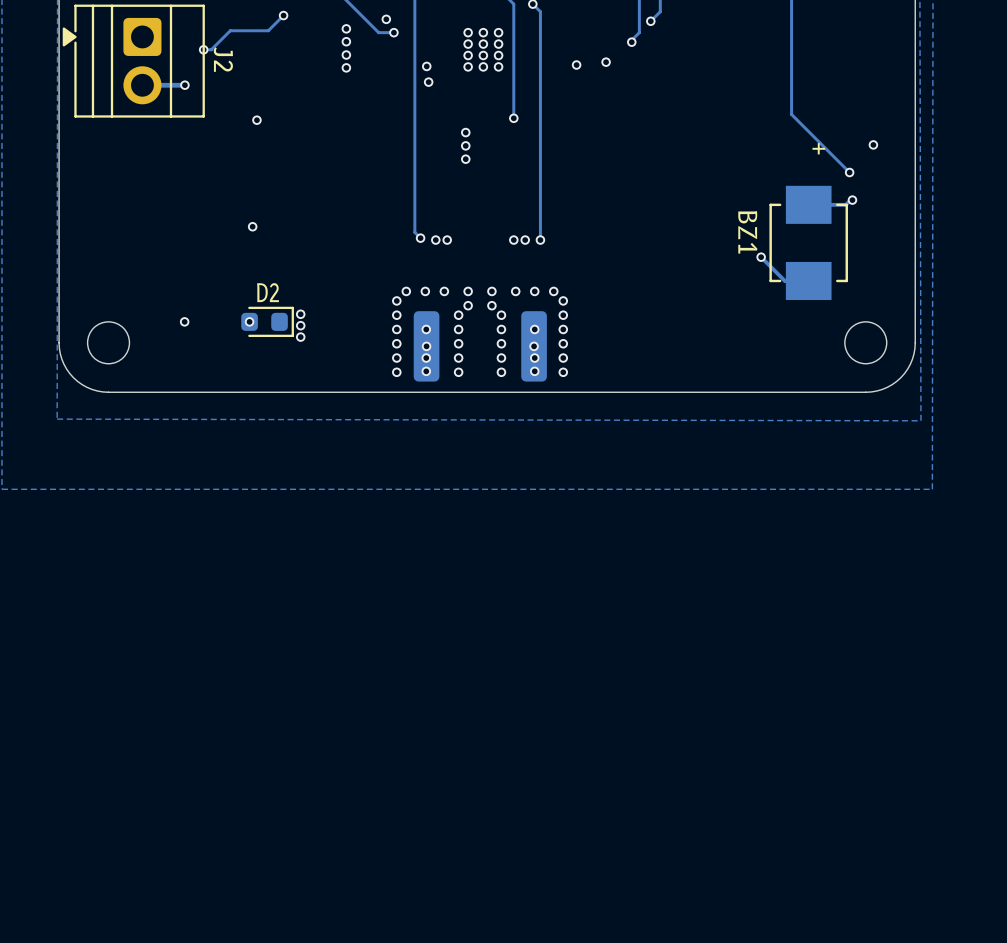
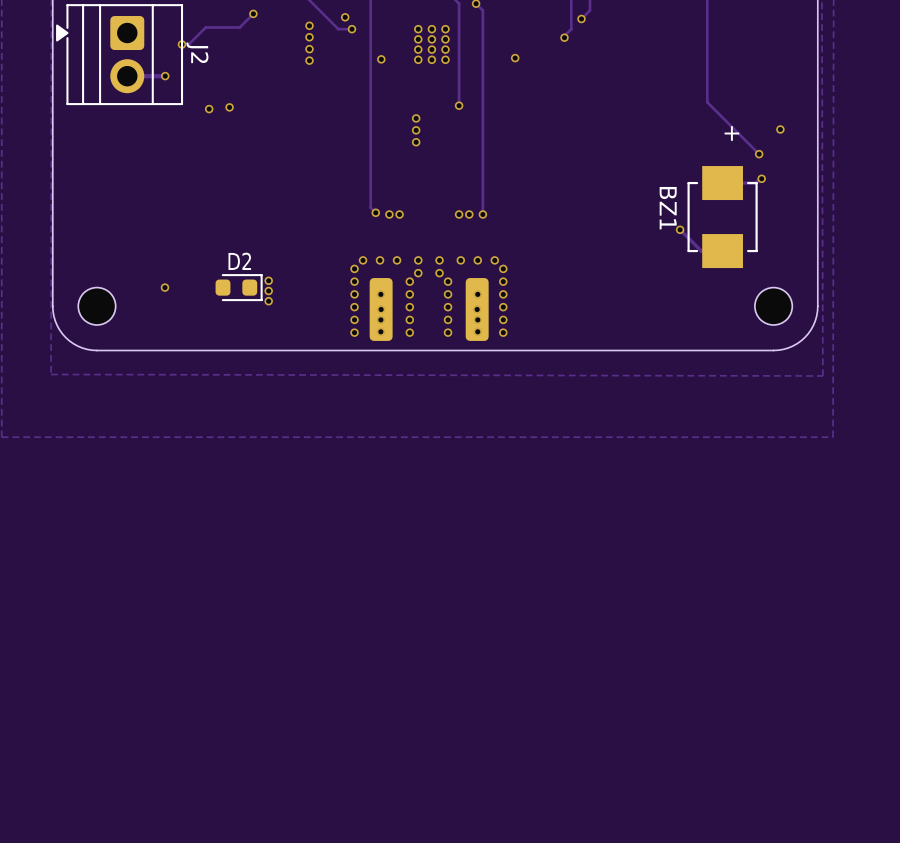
via: (606, 62) -> none
via: (428, 82) -> none
via: none -> (209, 109)
via: (252, 226) -> none
via: (249, 321) -> none

